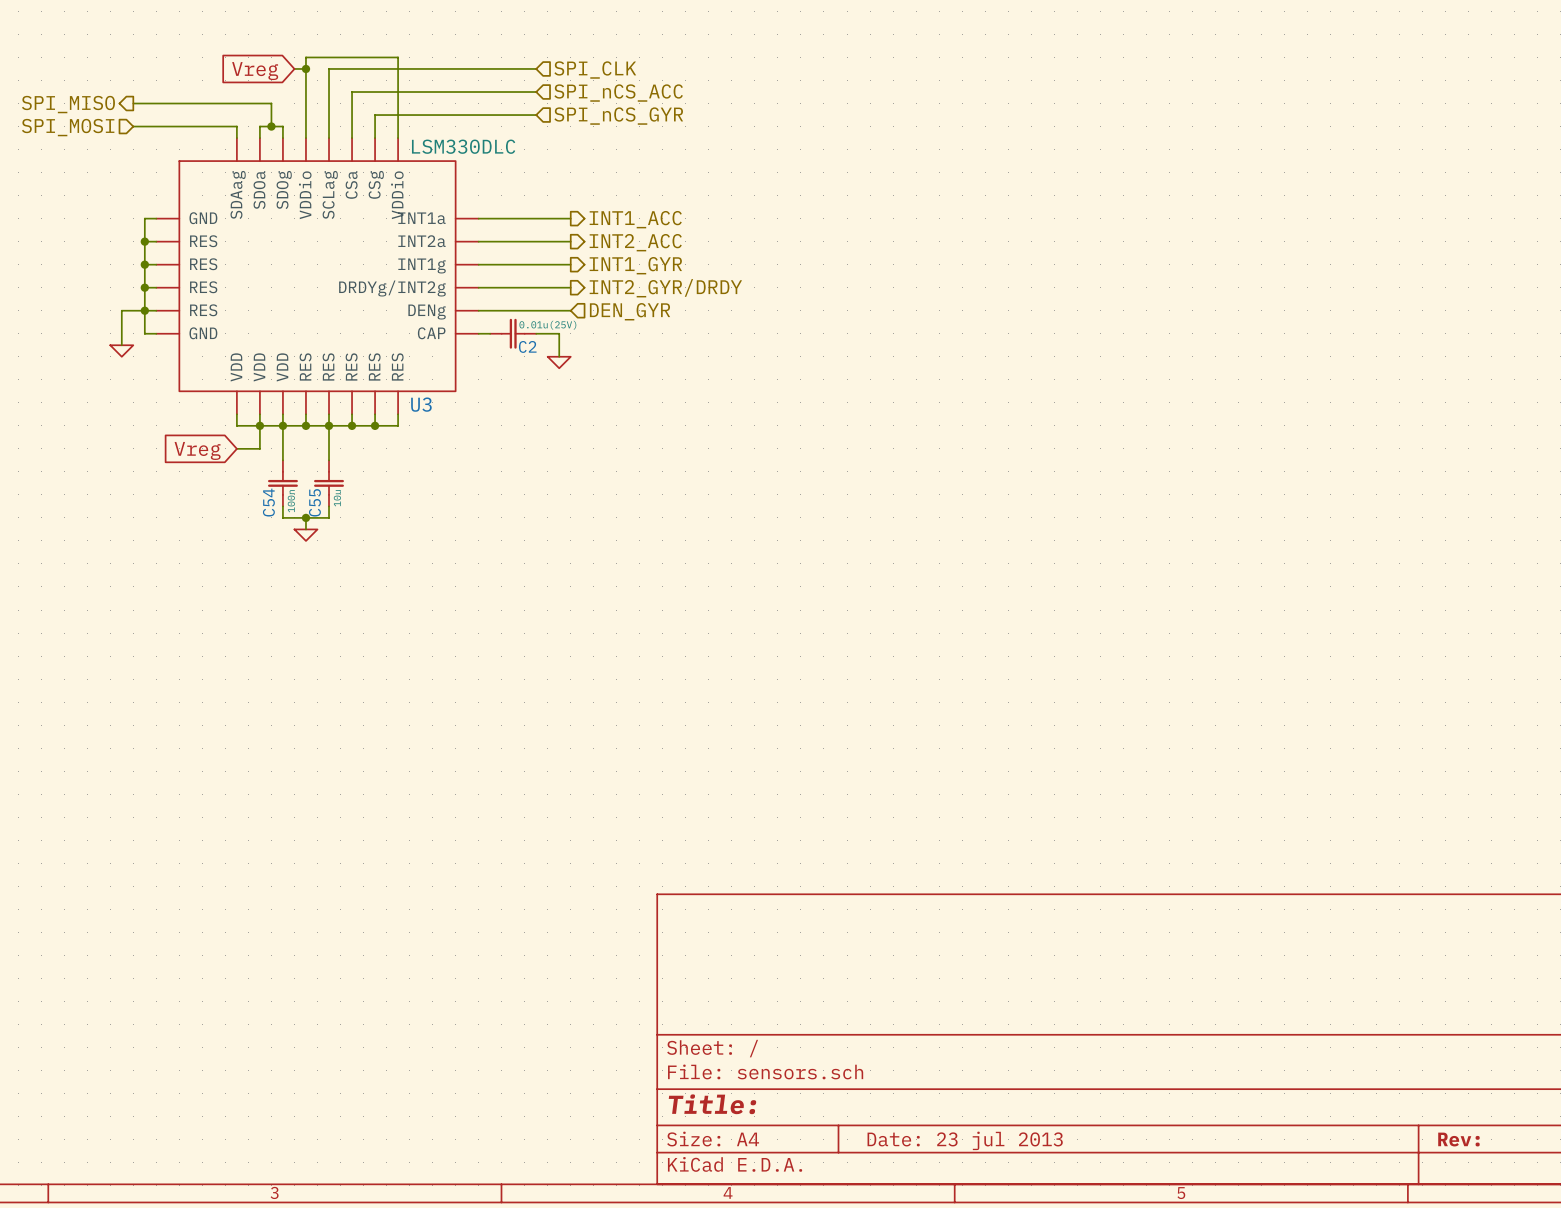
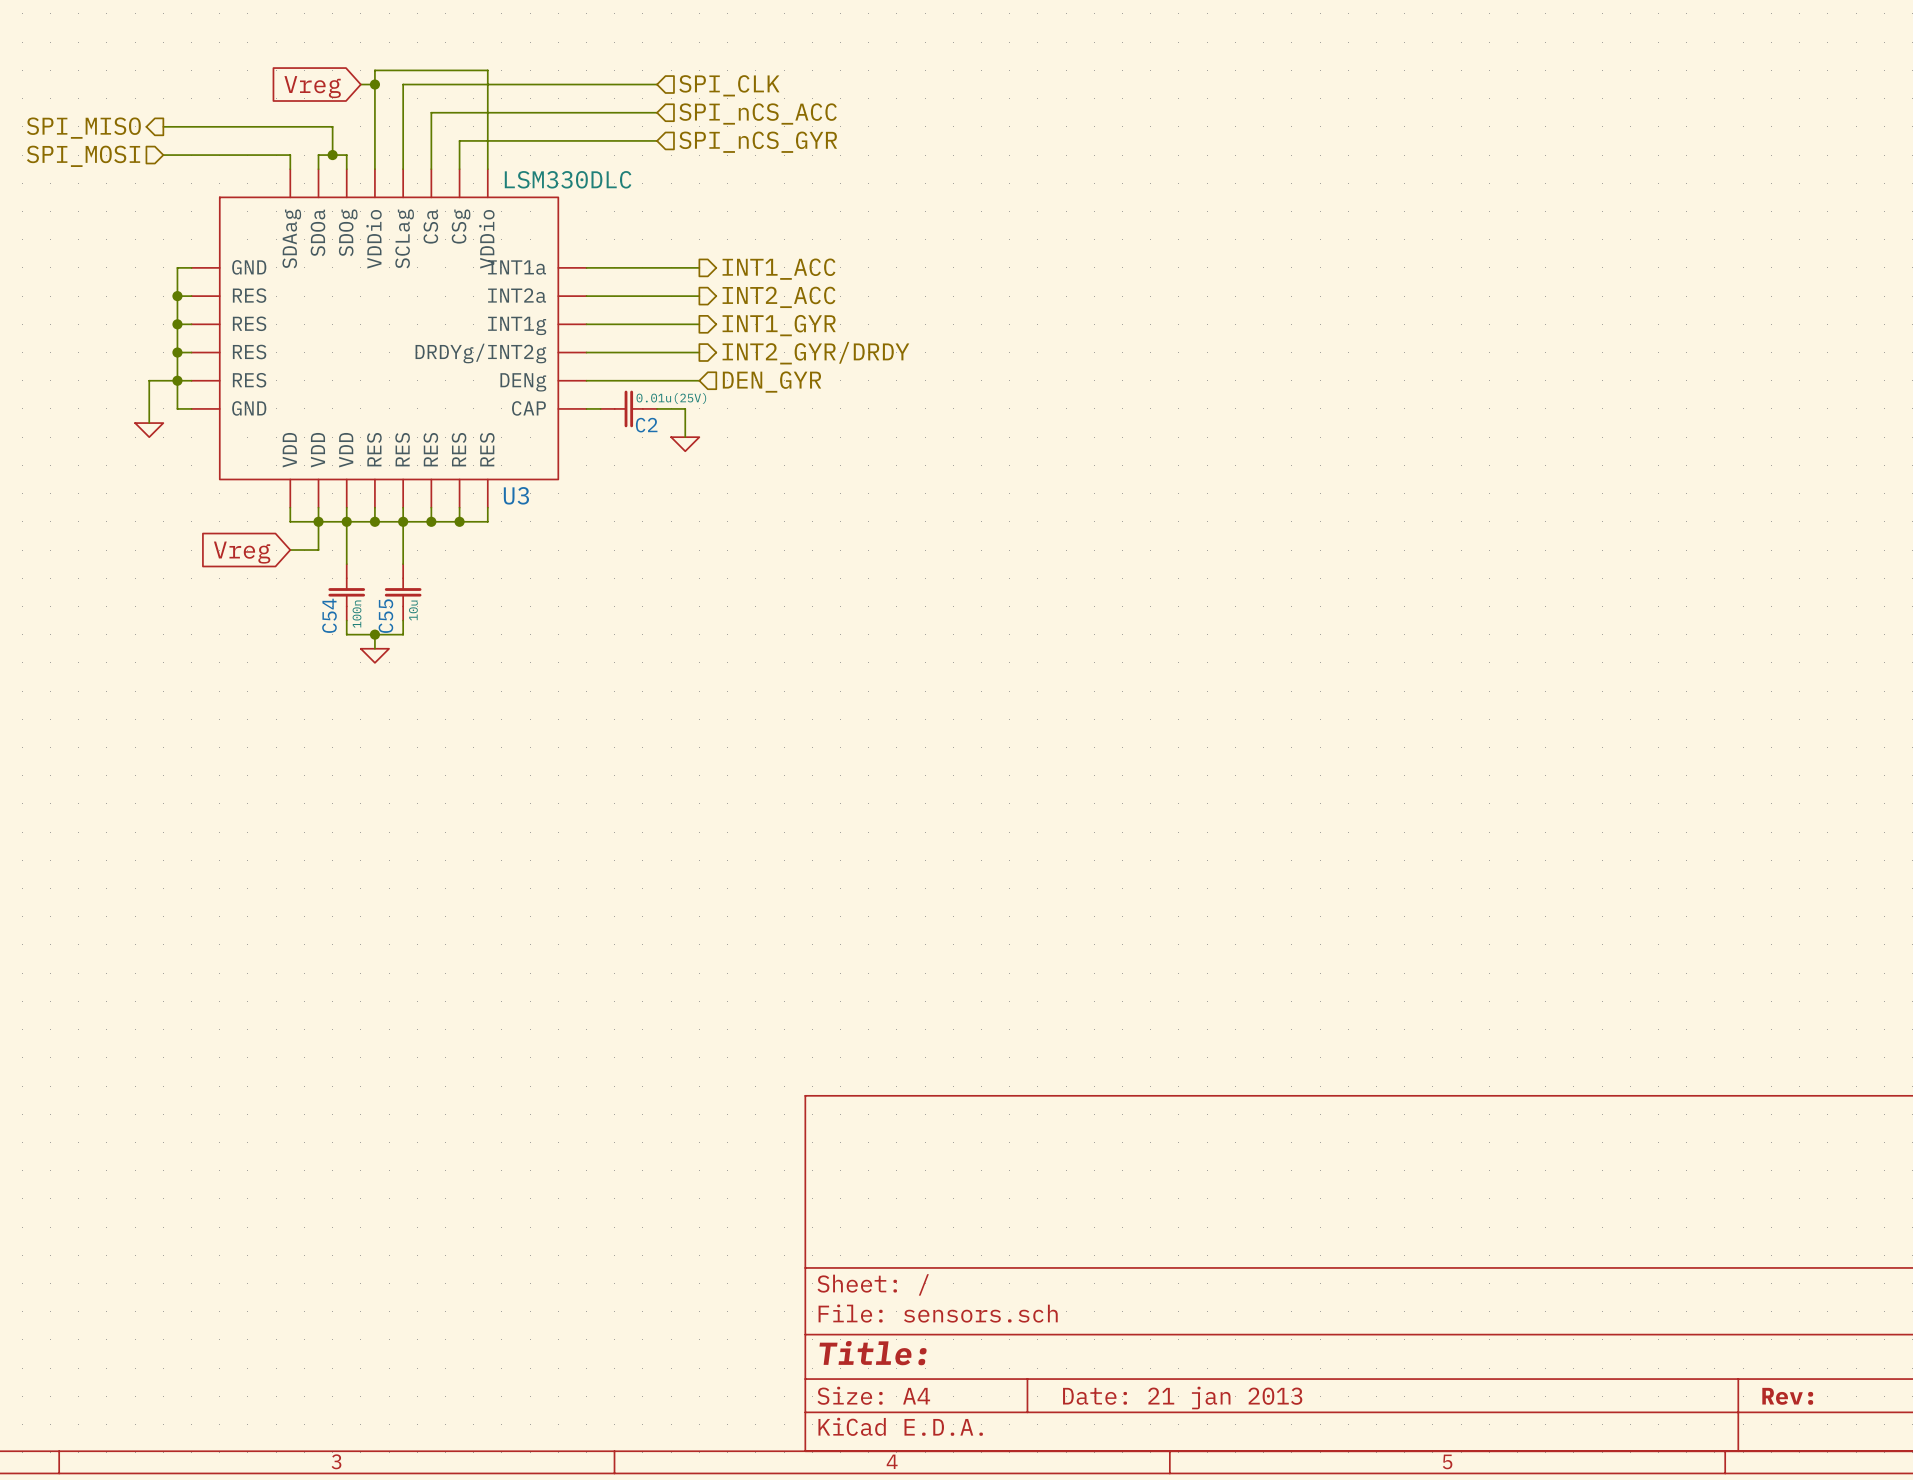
title block: Date: 23 jul 2013 (965, 1140) -> Date: 21 jan 2013 (1182, 1397)

